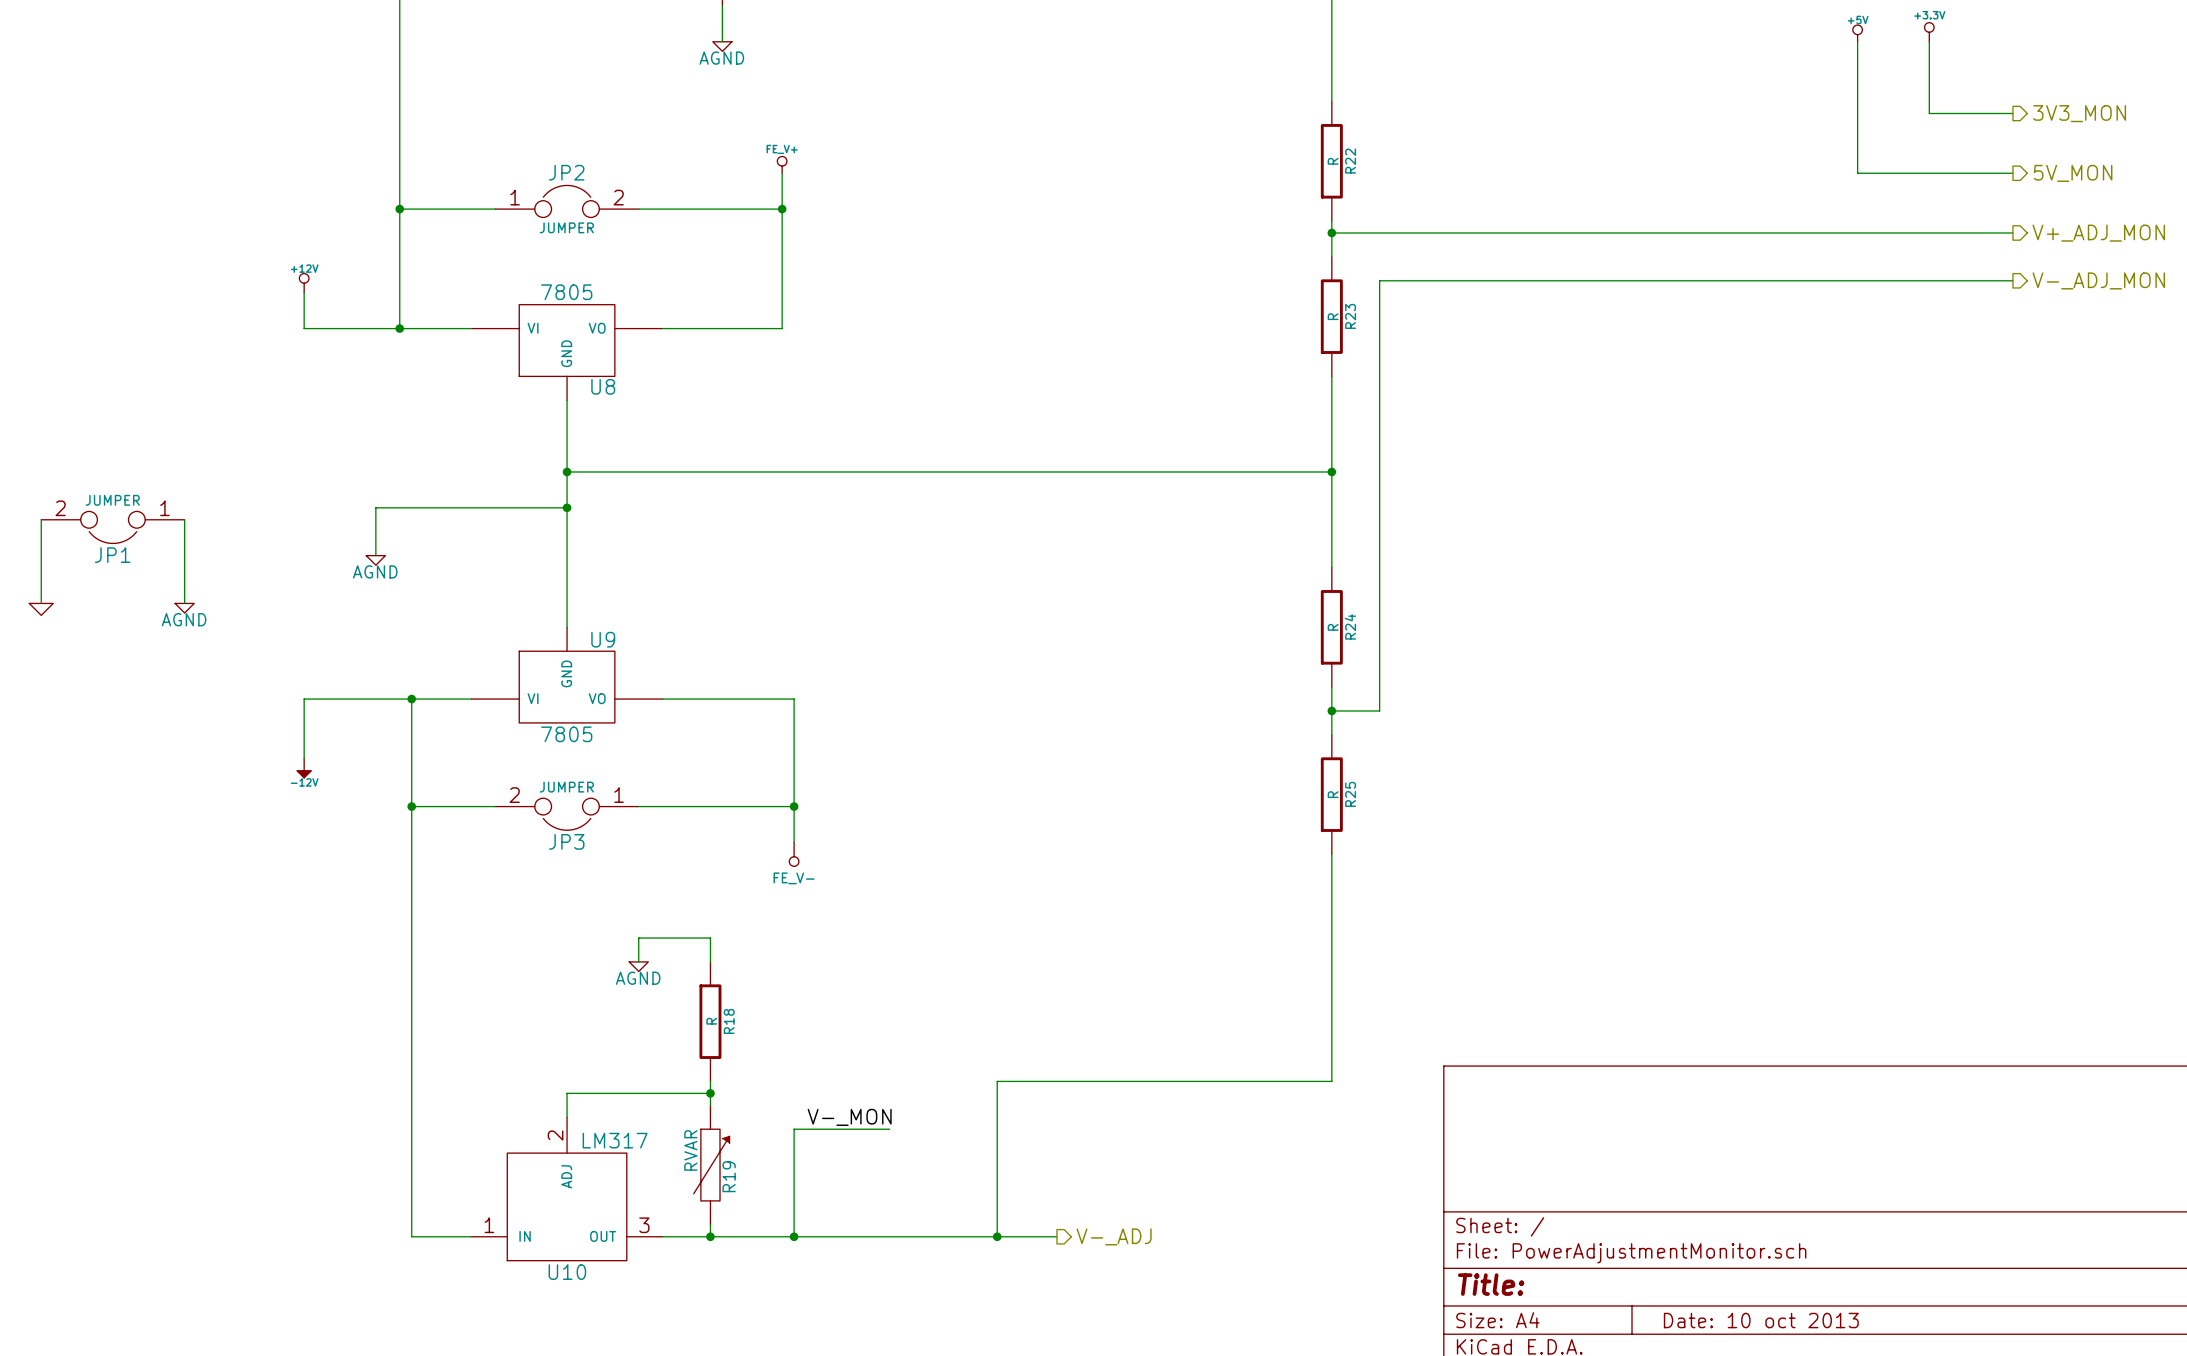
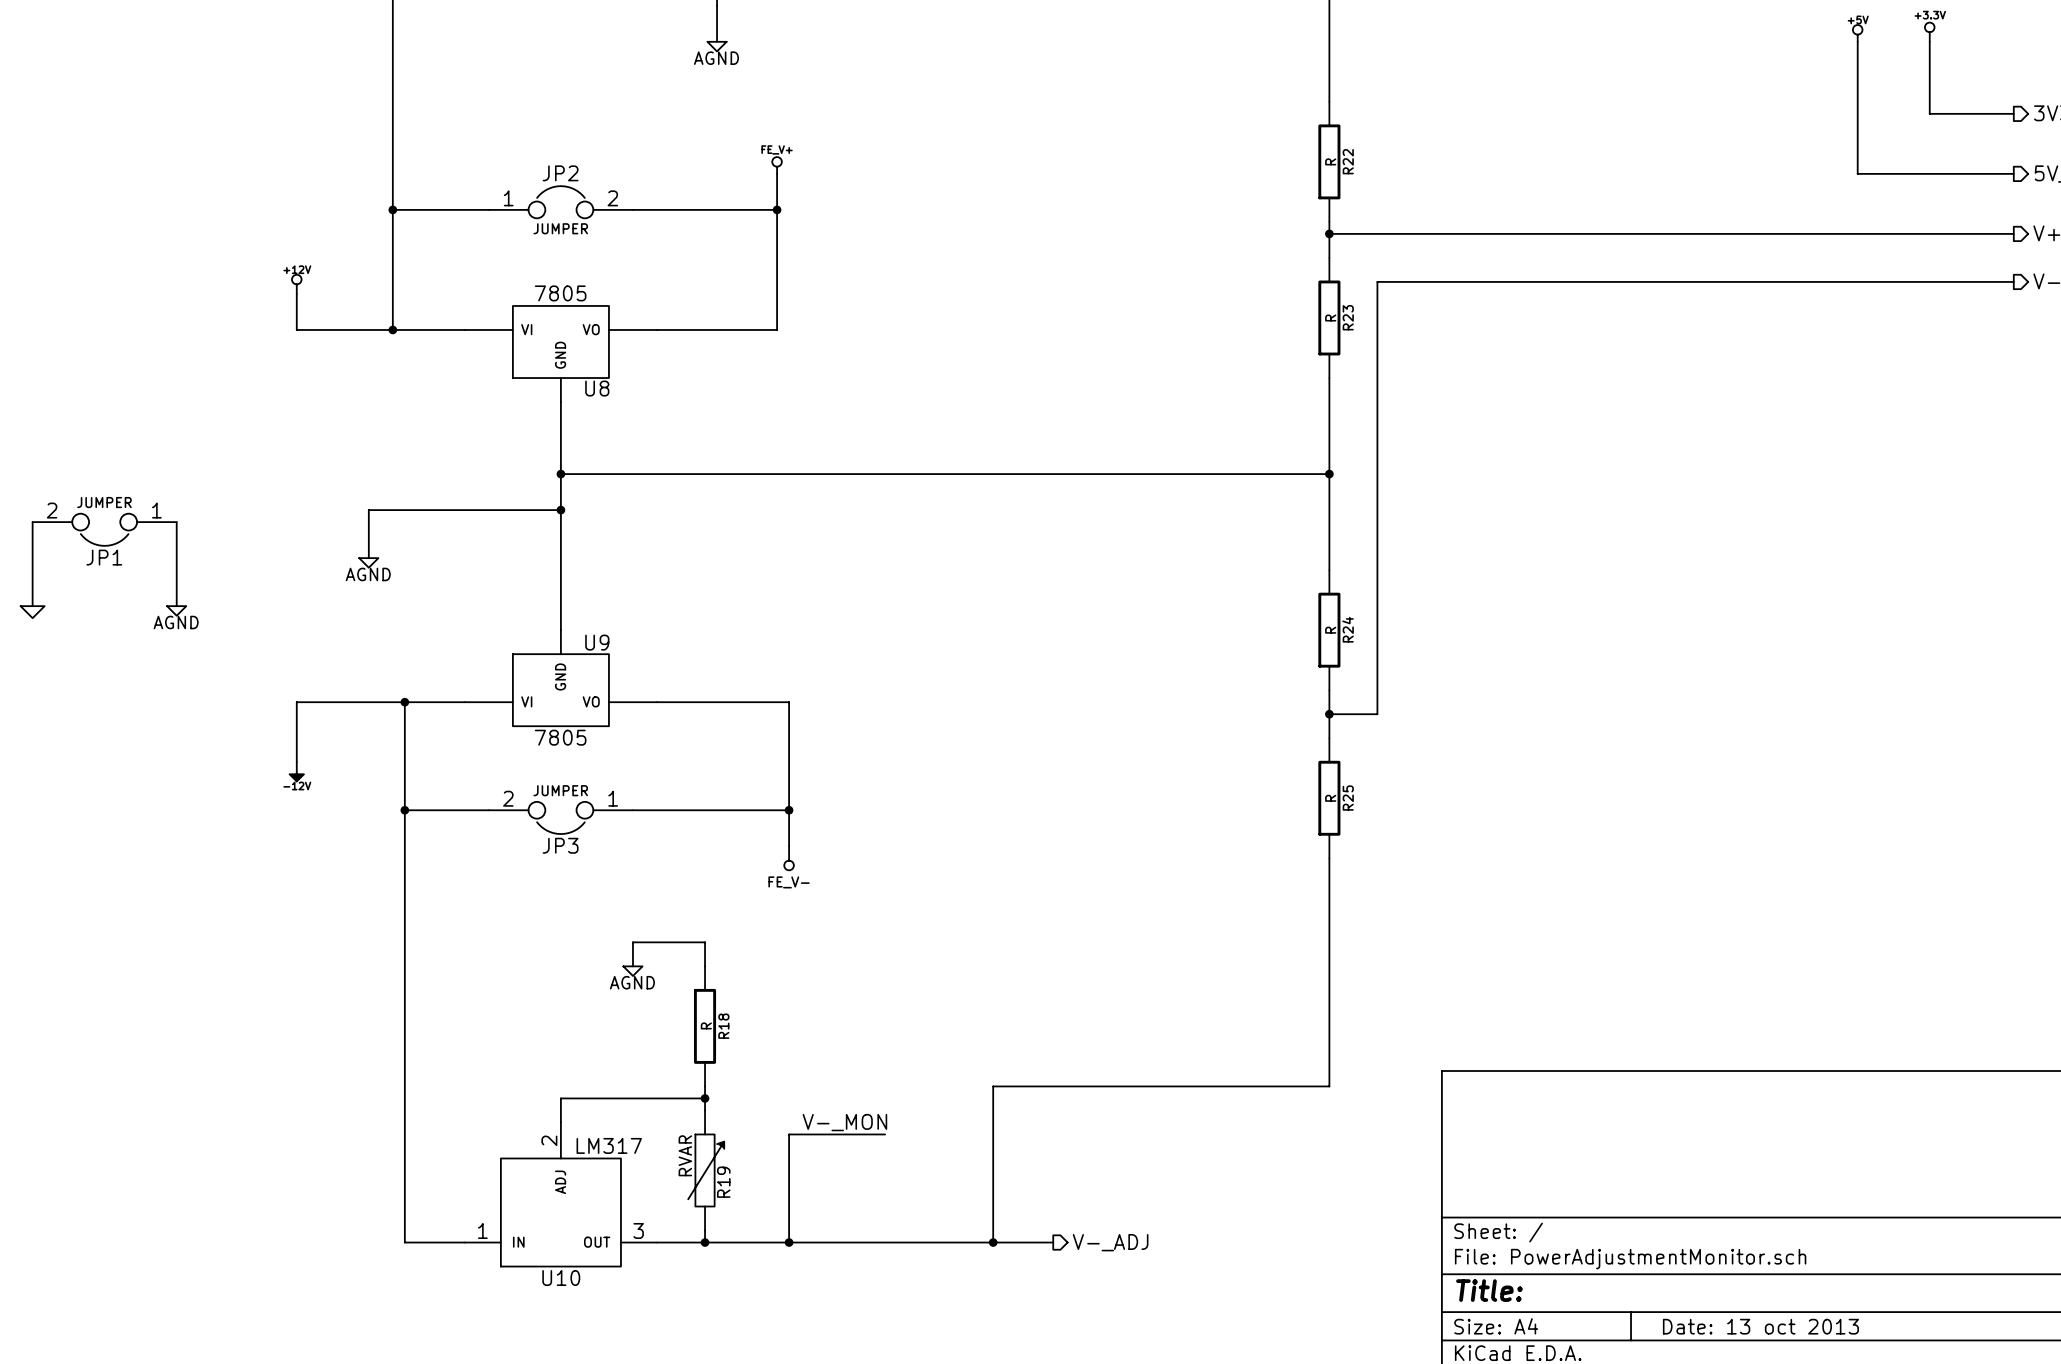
title block: Date: 10 oct 2013 (1761, 1320) -> Date: 13 oct 2013 (1760, 1326)

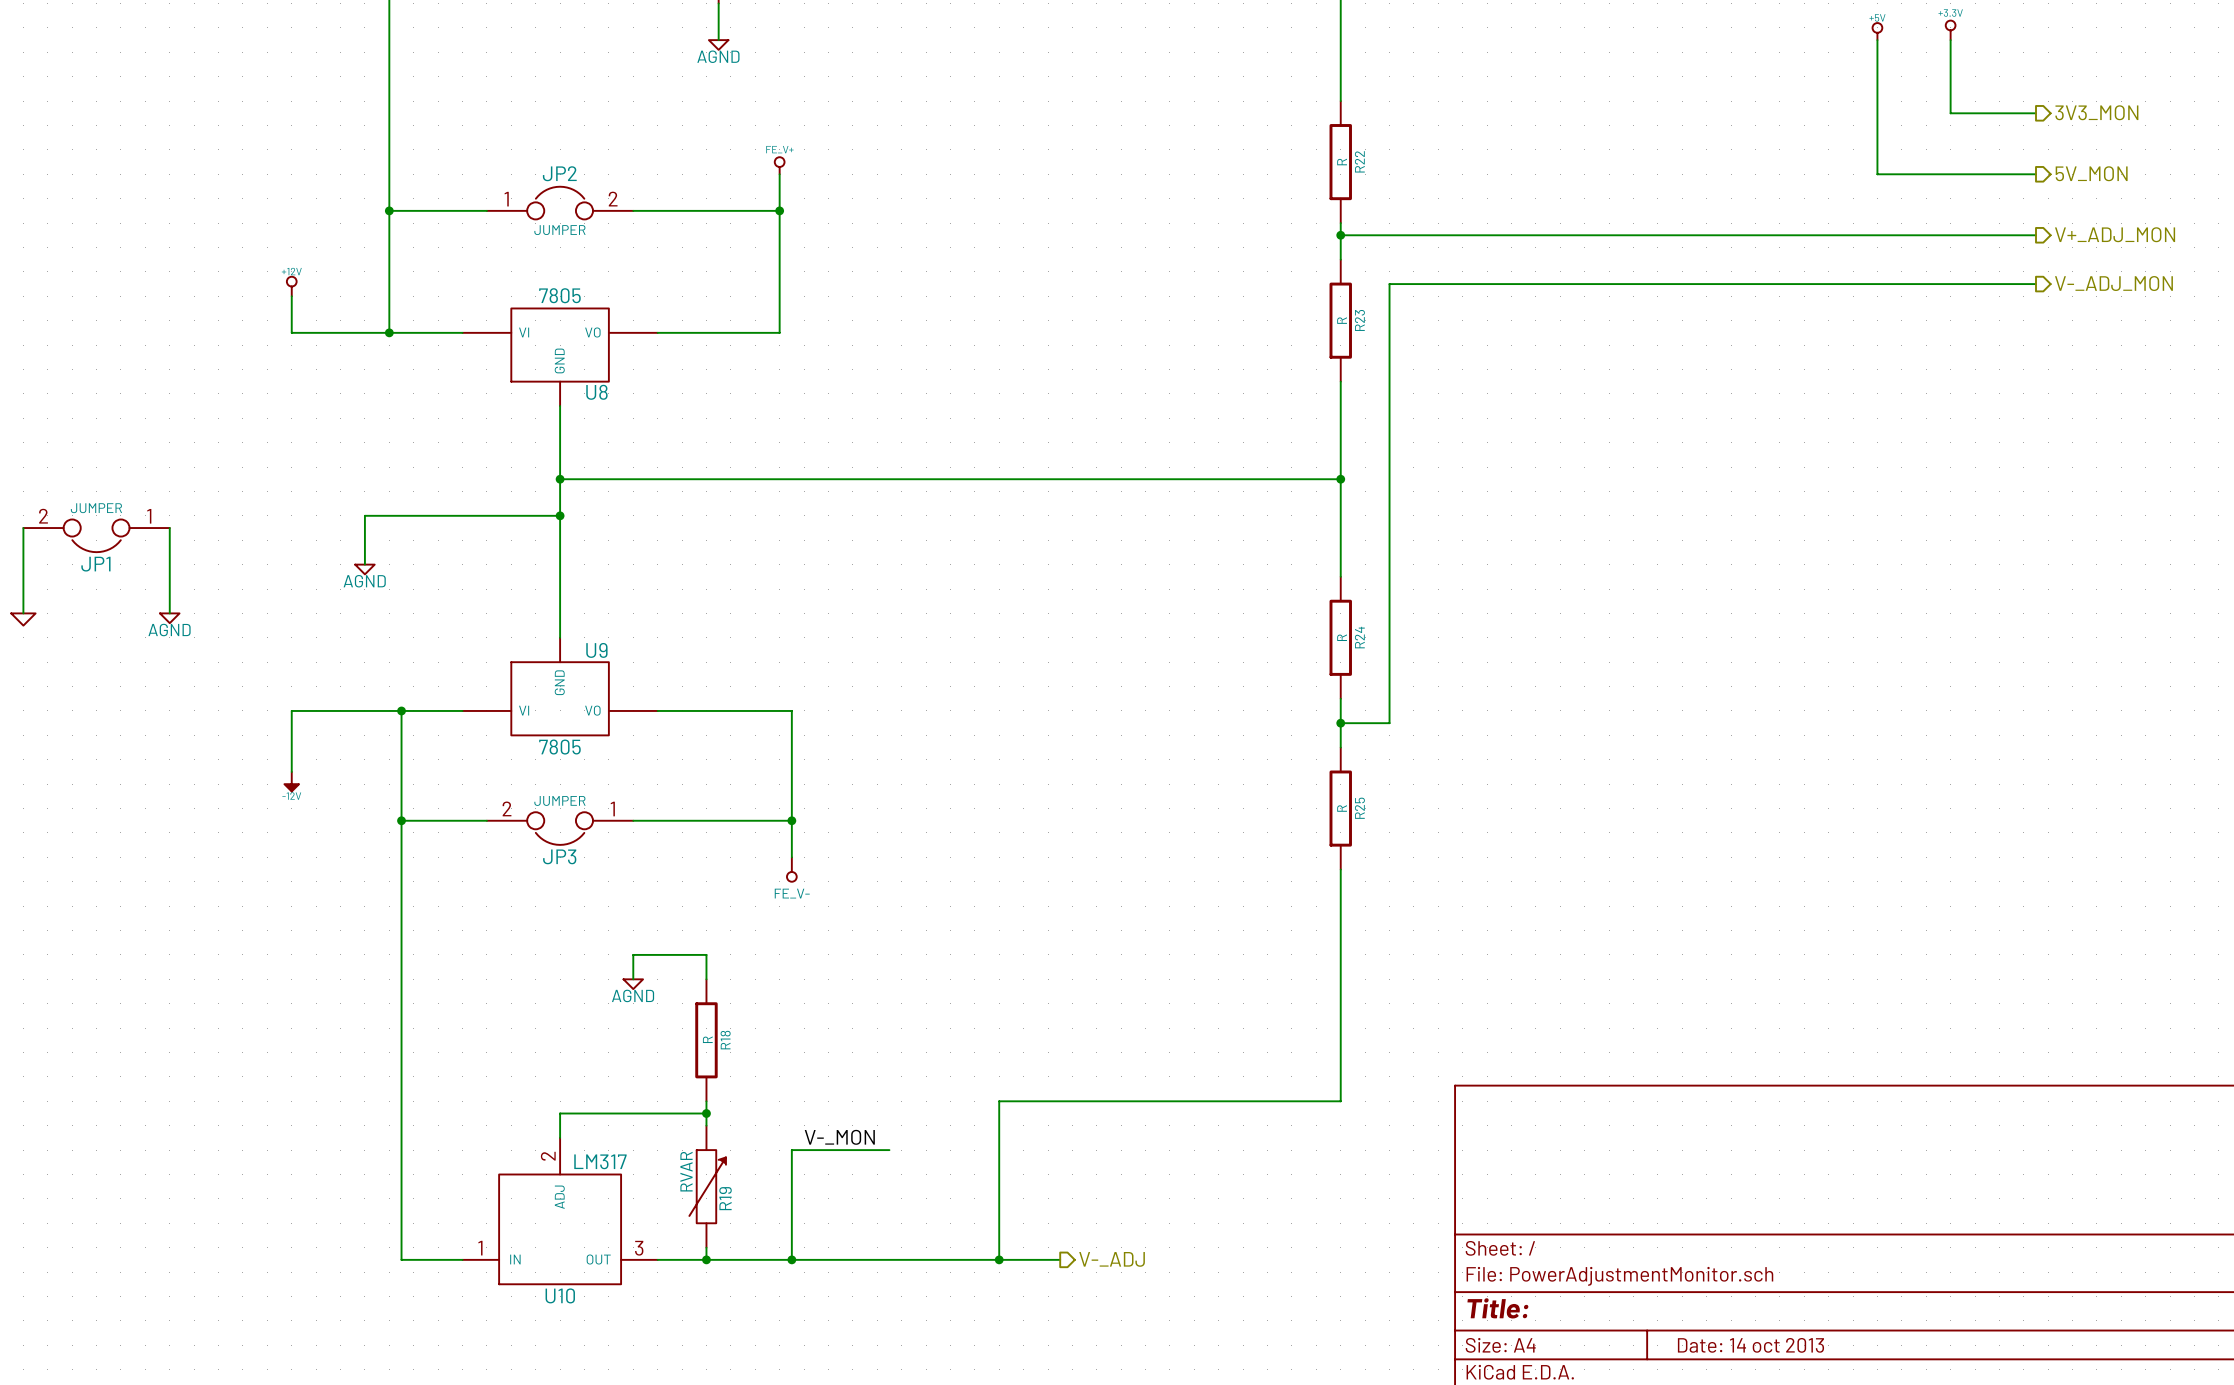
title block: Date: 13 oct 2013 (1760, 1326) -> Date: 14 oct 2013 (1750, 1345)

